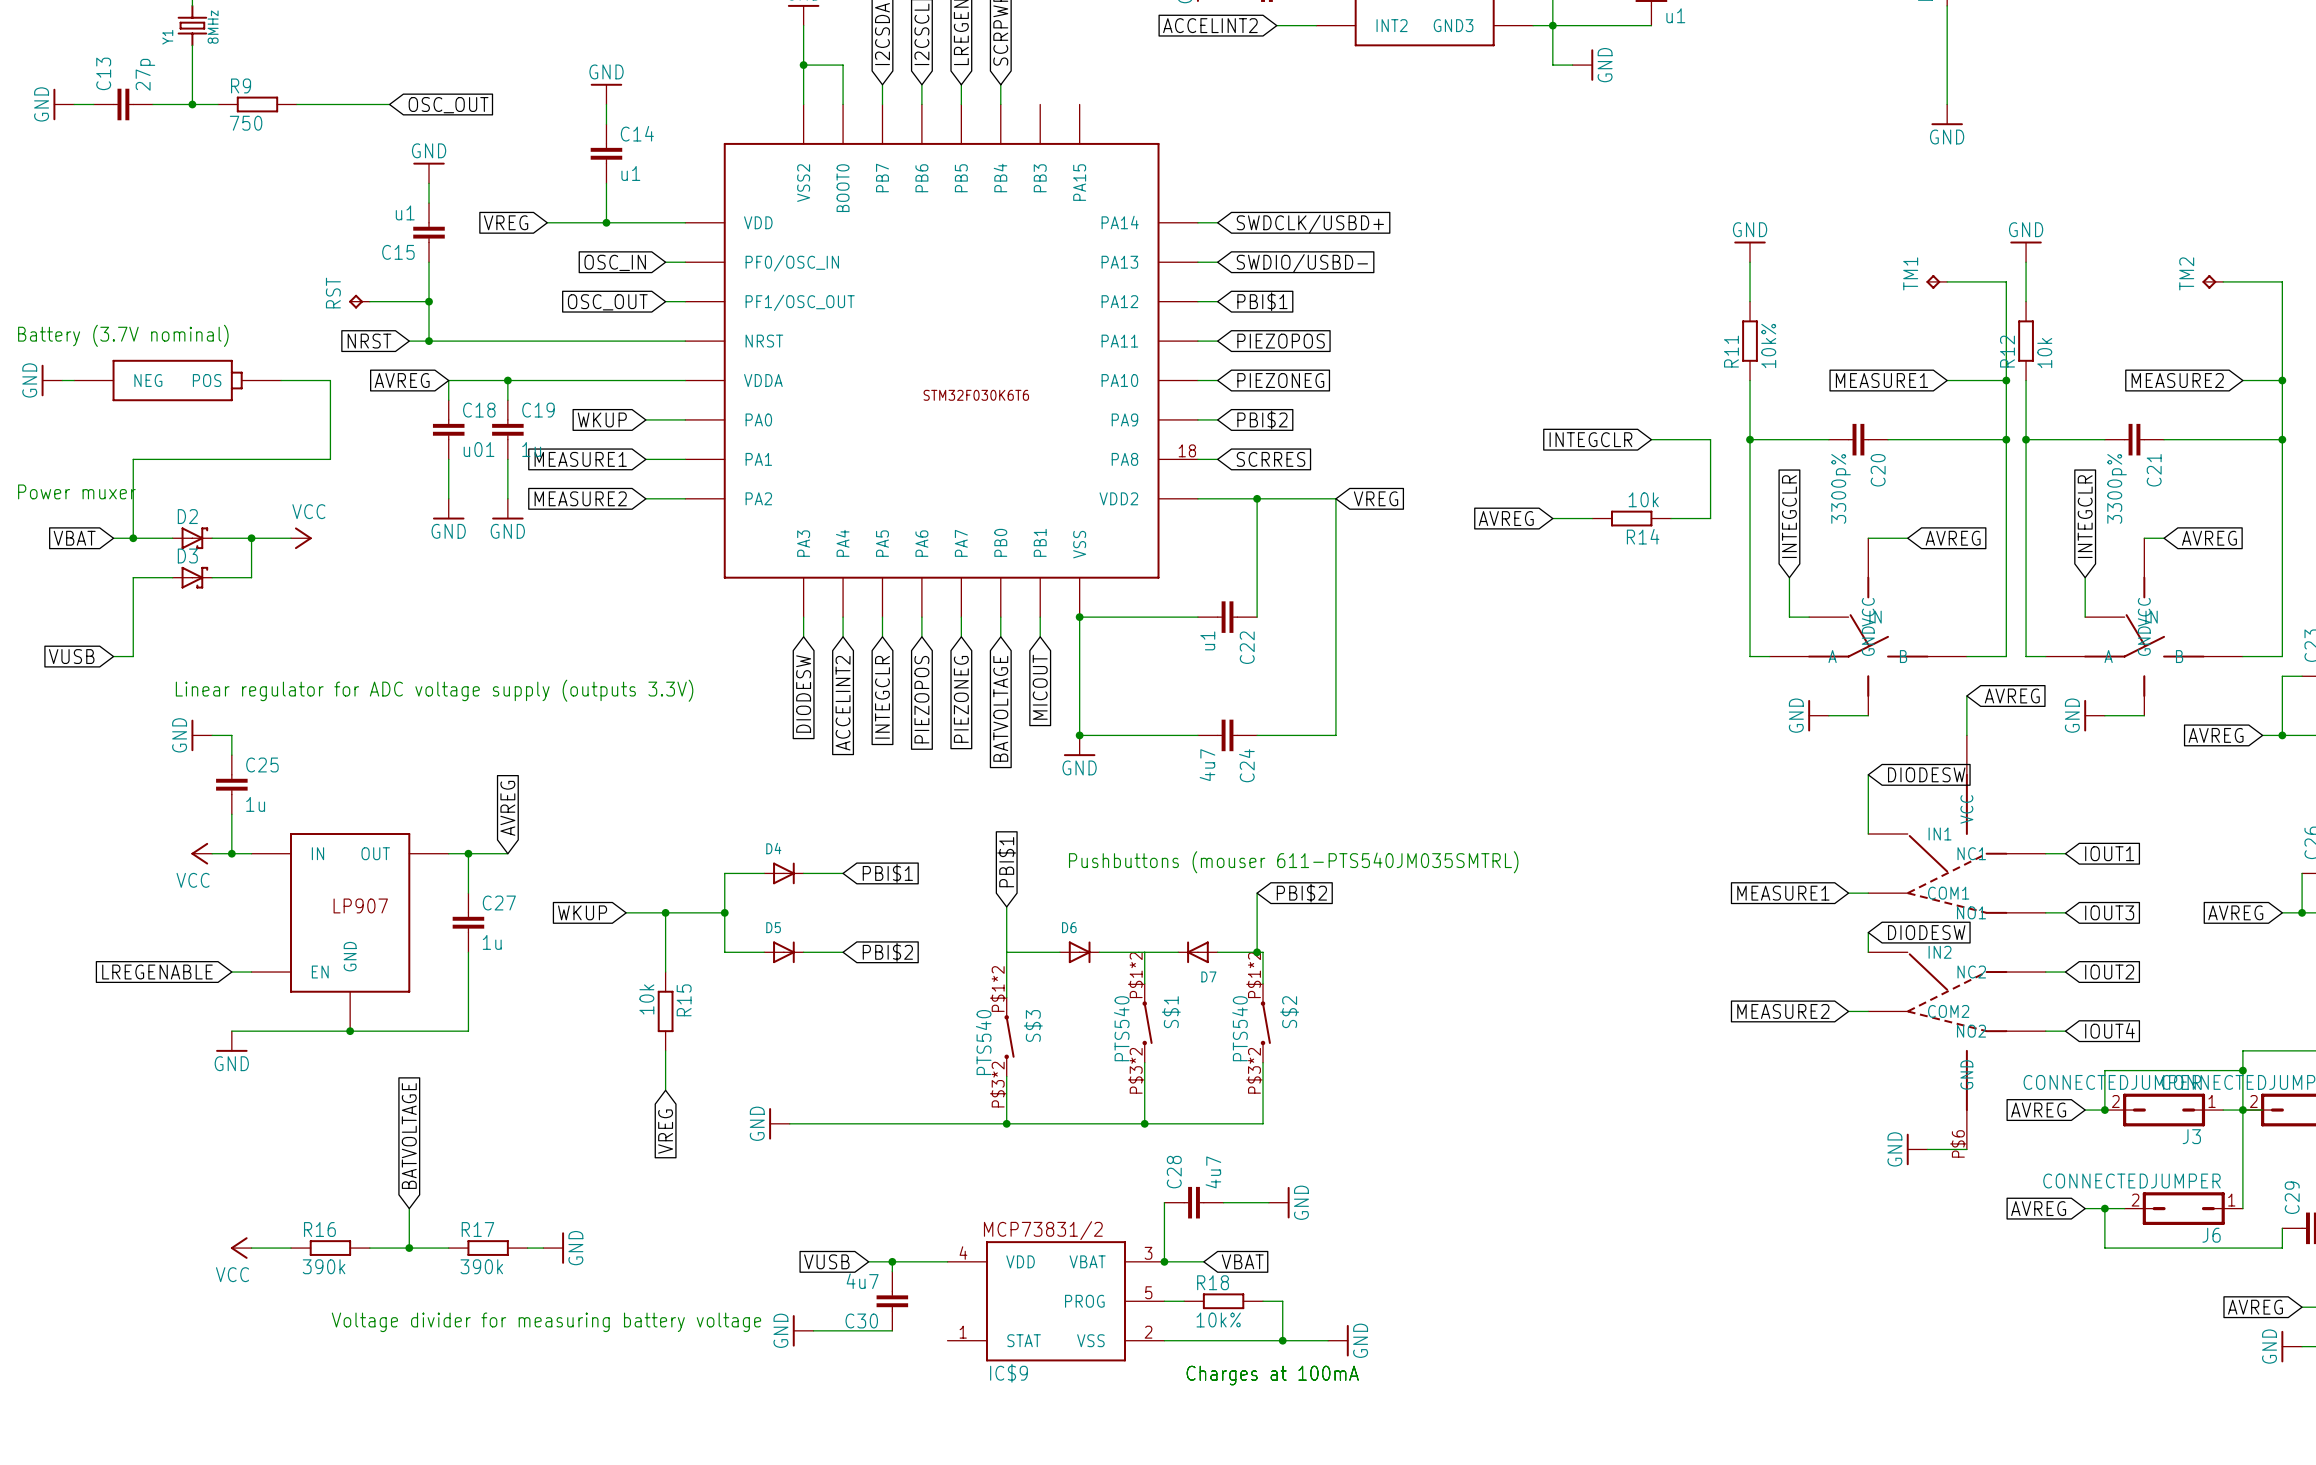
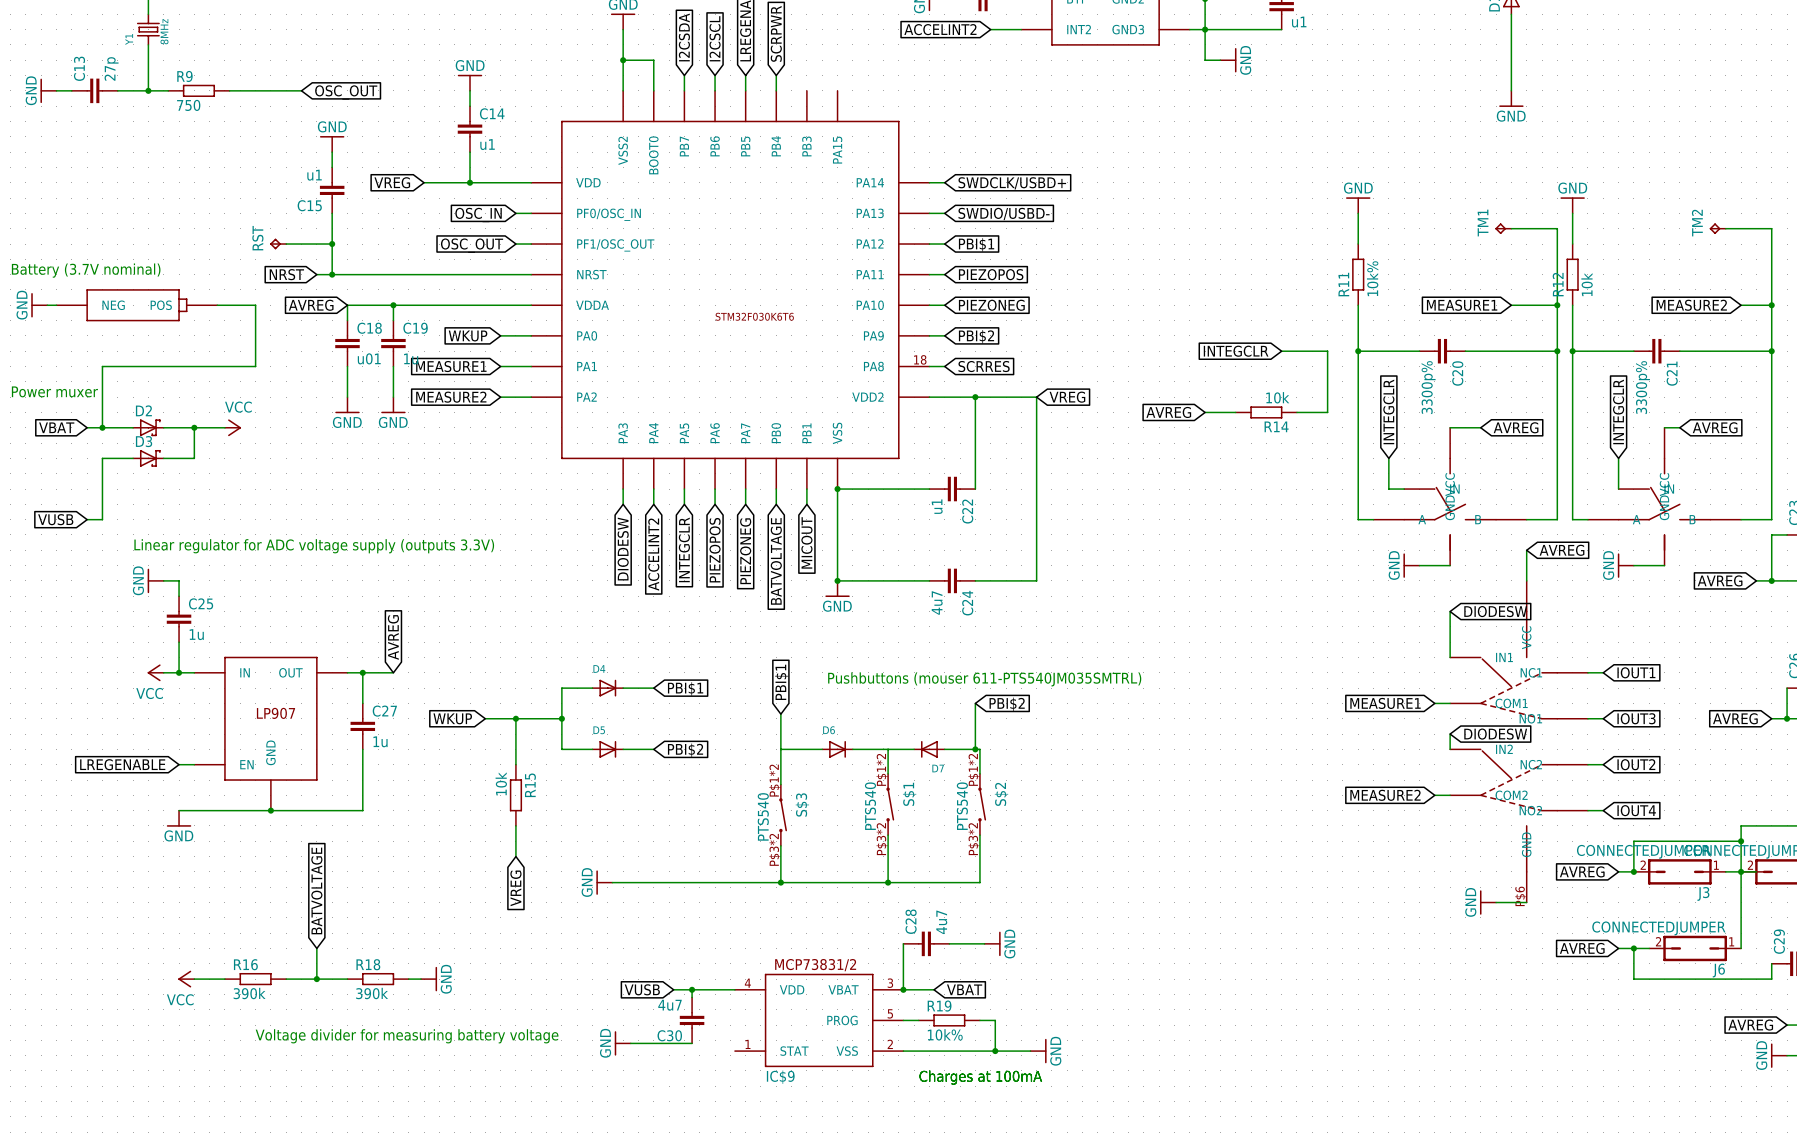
R17 name: R17 (477, 1229) -> R18 (368, 964)
R18 name: R18 (1213, 1282) -> R19 (939, 1006)

